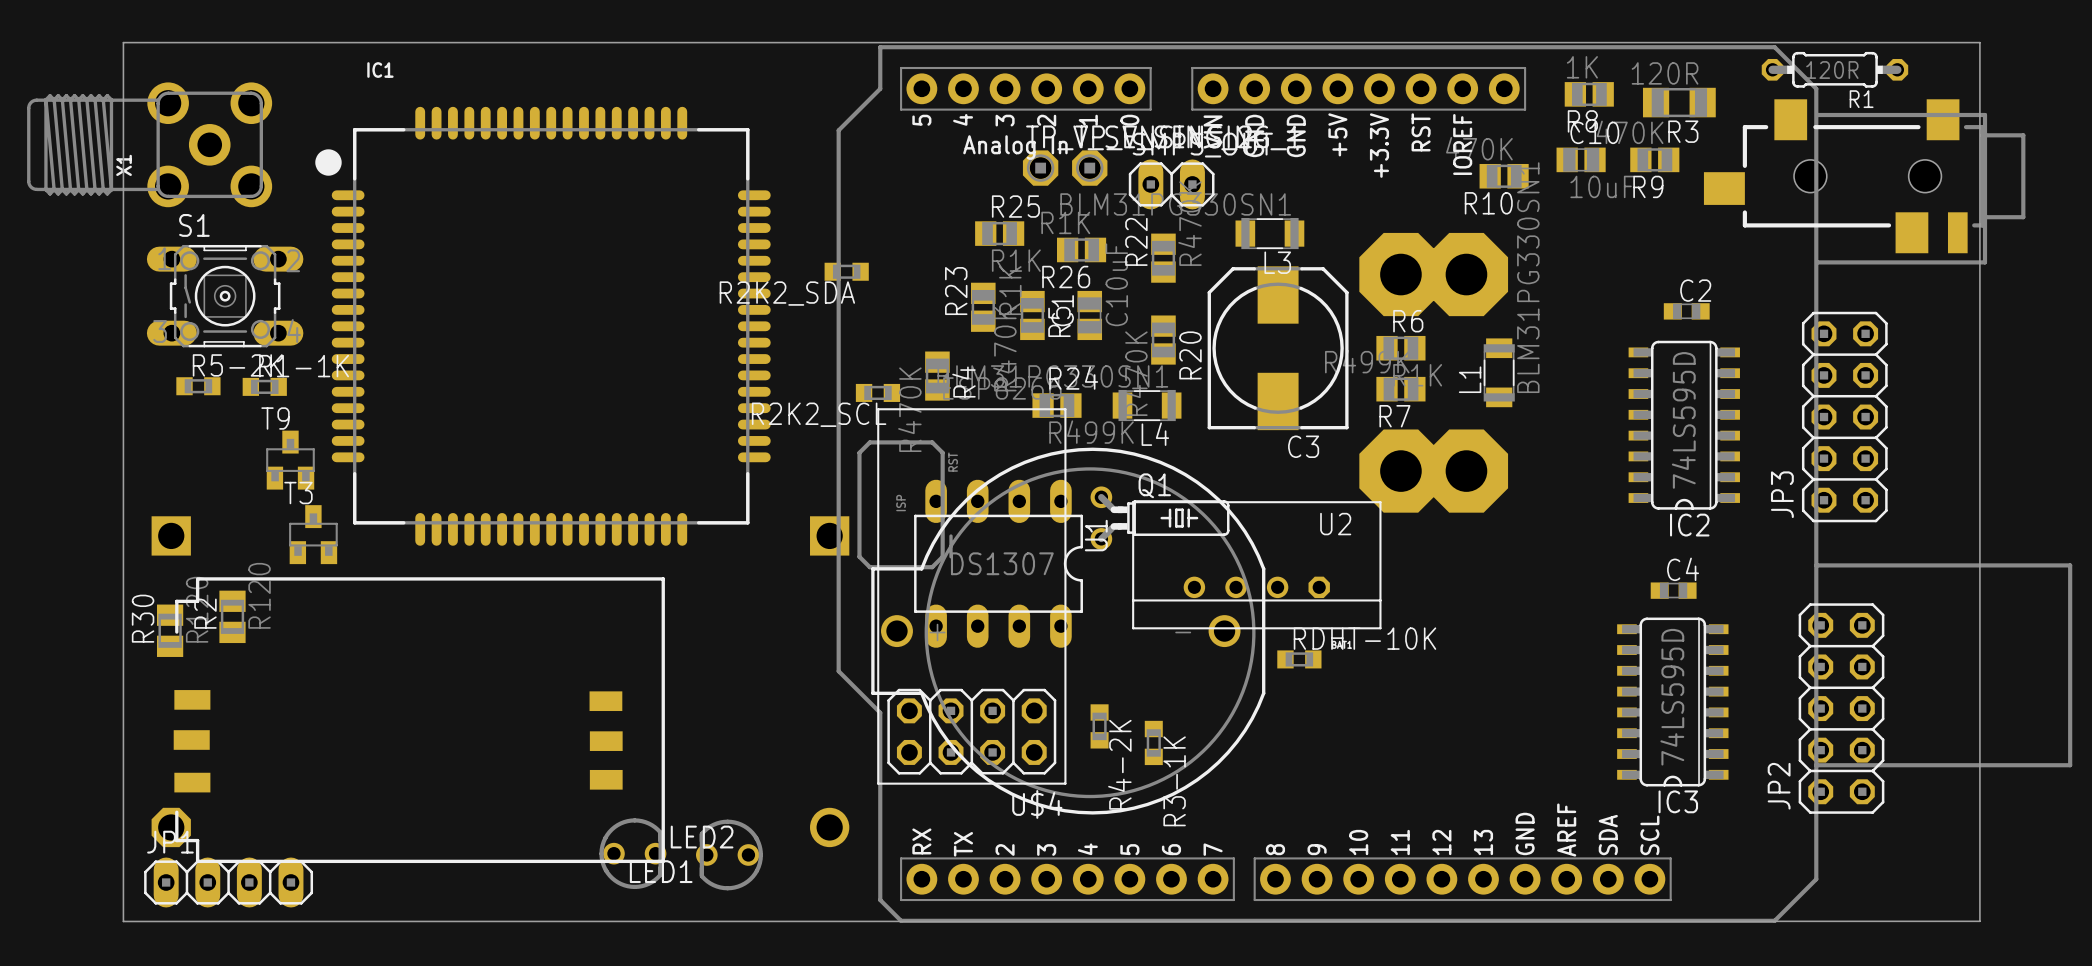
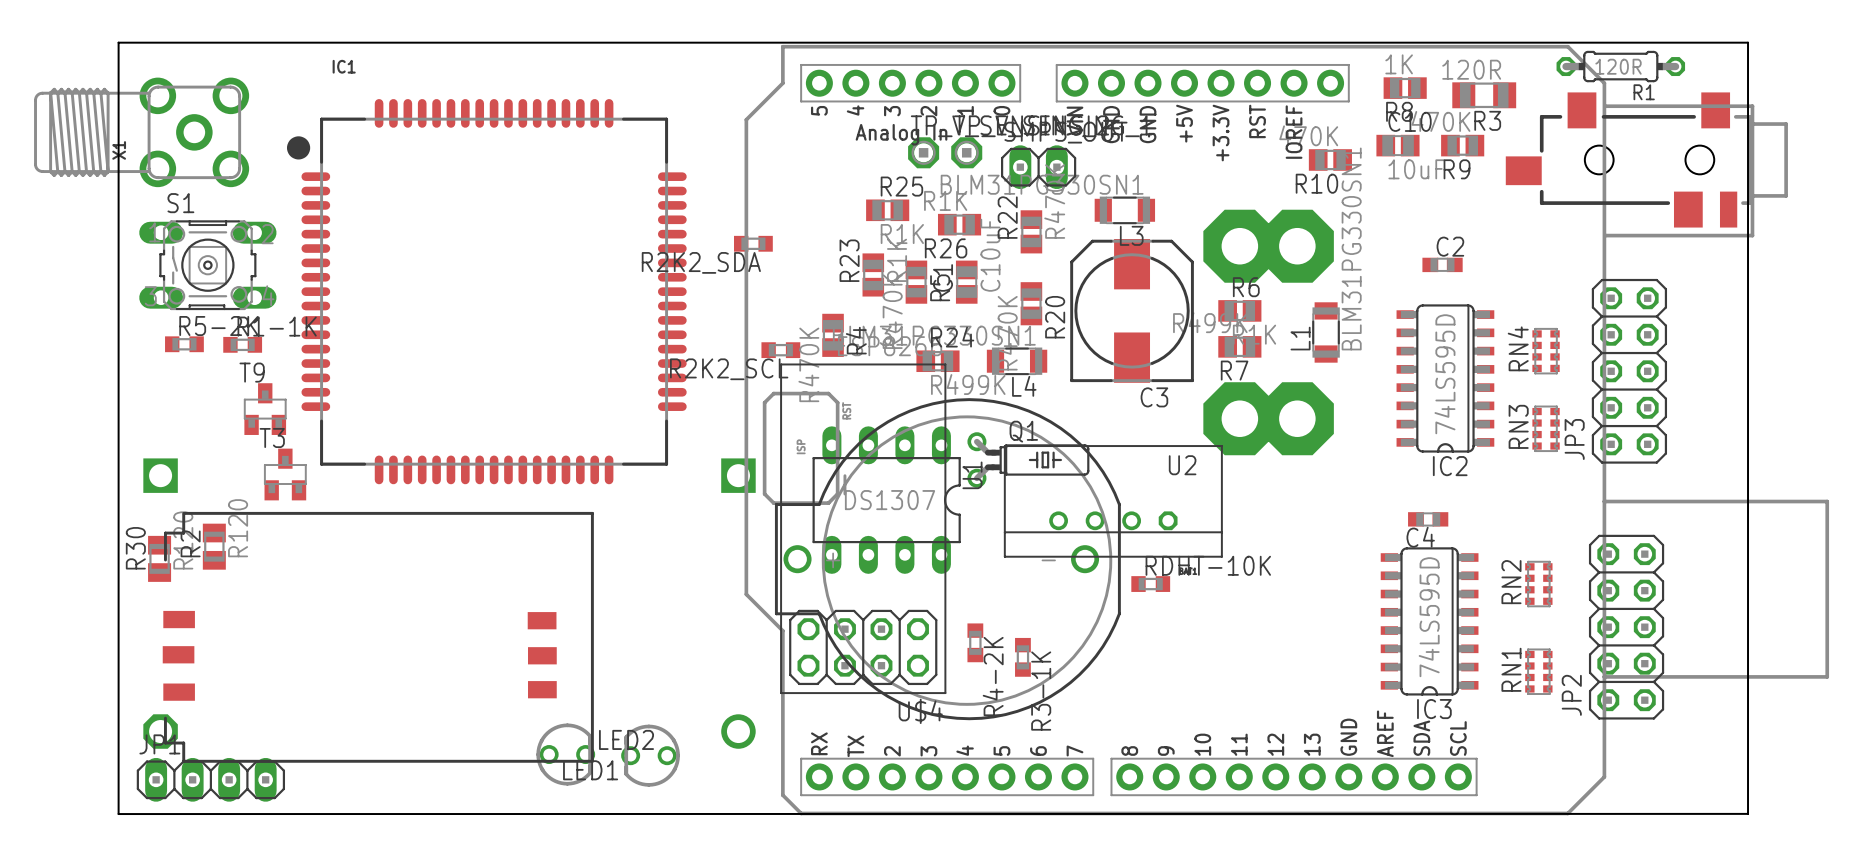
C2 position: (1686, 311) -> (1442, 264)
RN4: none -> (1546, 351)
IC2 position: (1684, 425) -> (1445, 378)
RN3: none -> (1546, 428)
C4 name position: C4 (1683, 569) -> C4 (1420, 537)
C4 position: (1673, 590) -> (1428, 519)
RN2: none -> (1538, 584)
IC3 position: (1672, 702) -> (1429, 621)
RN1: none -> (1538, 671)

